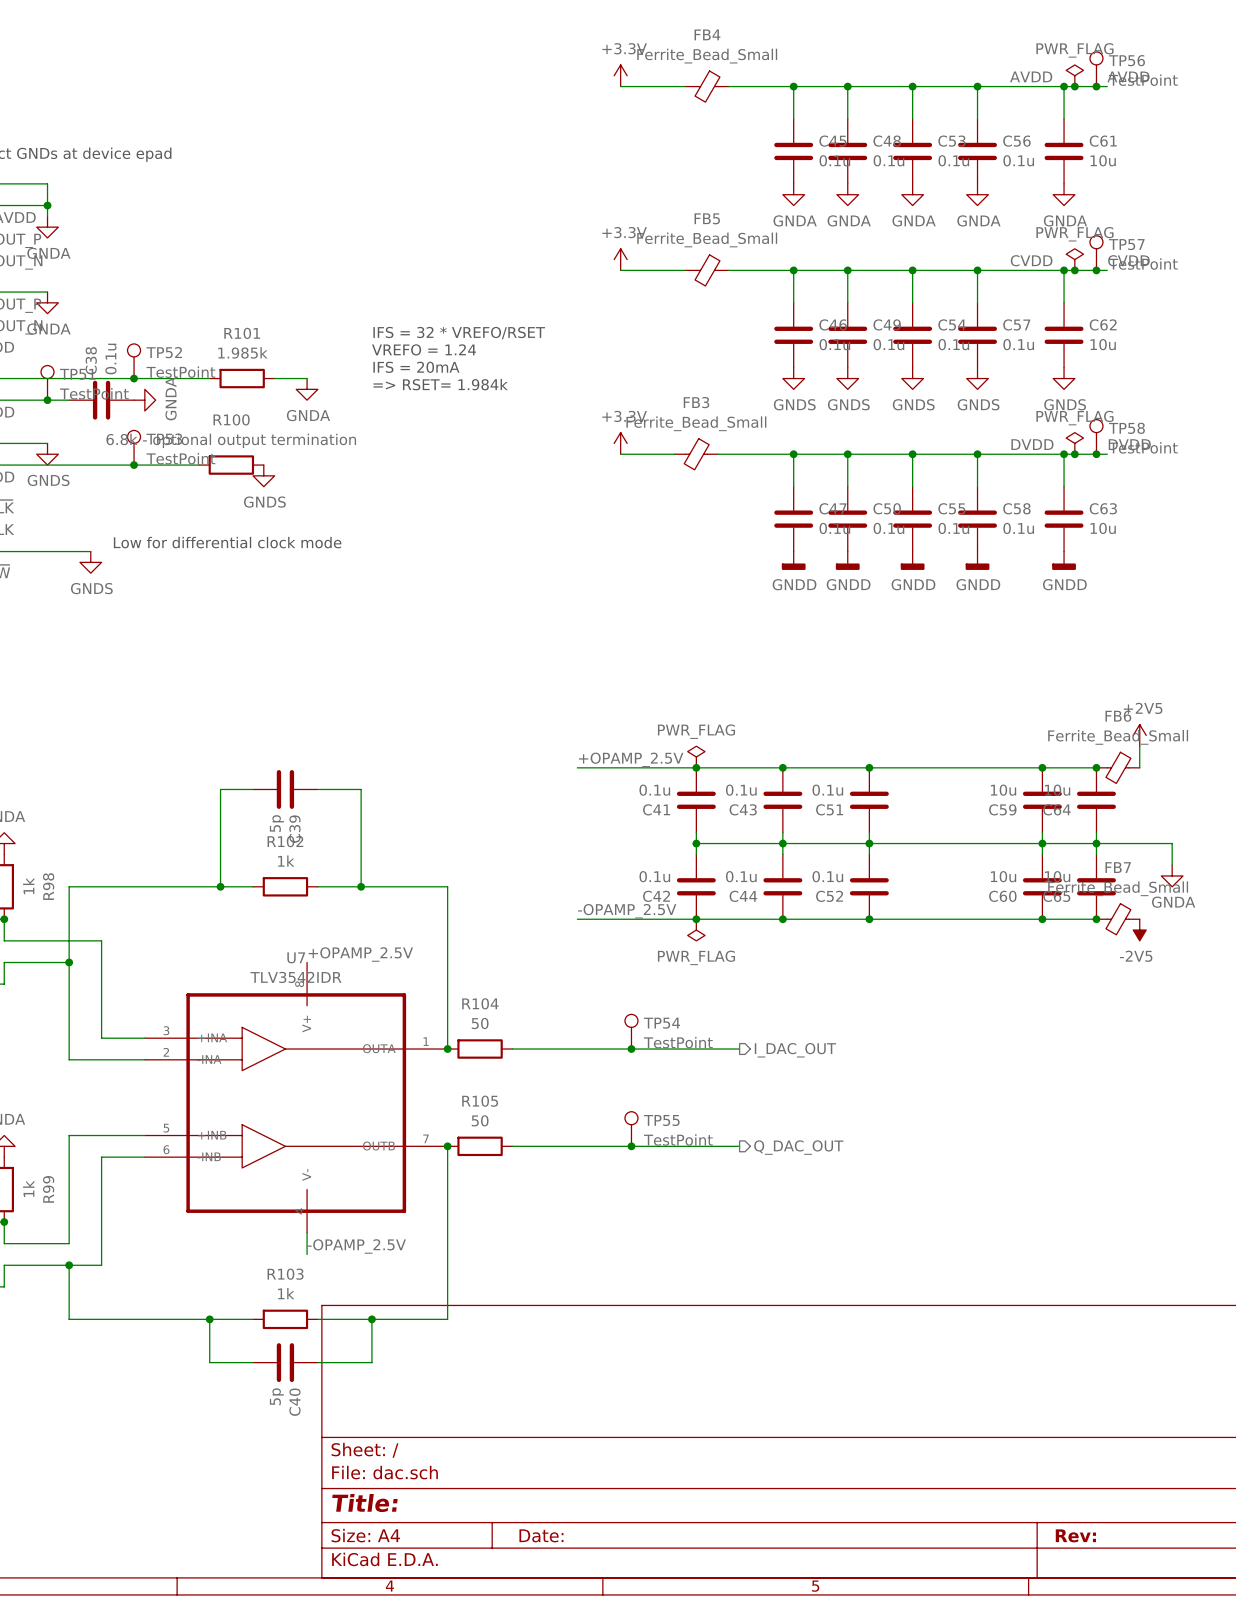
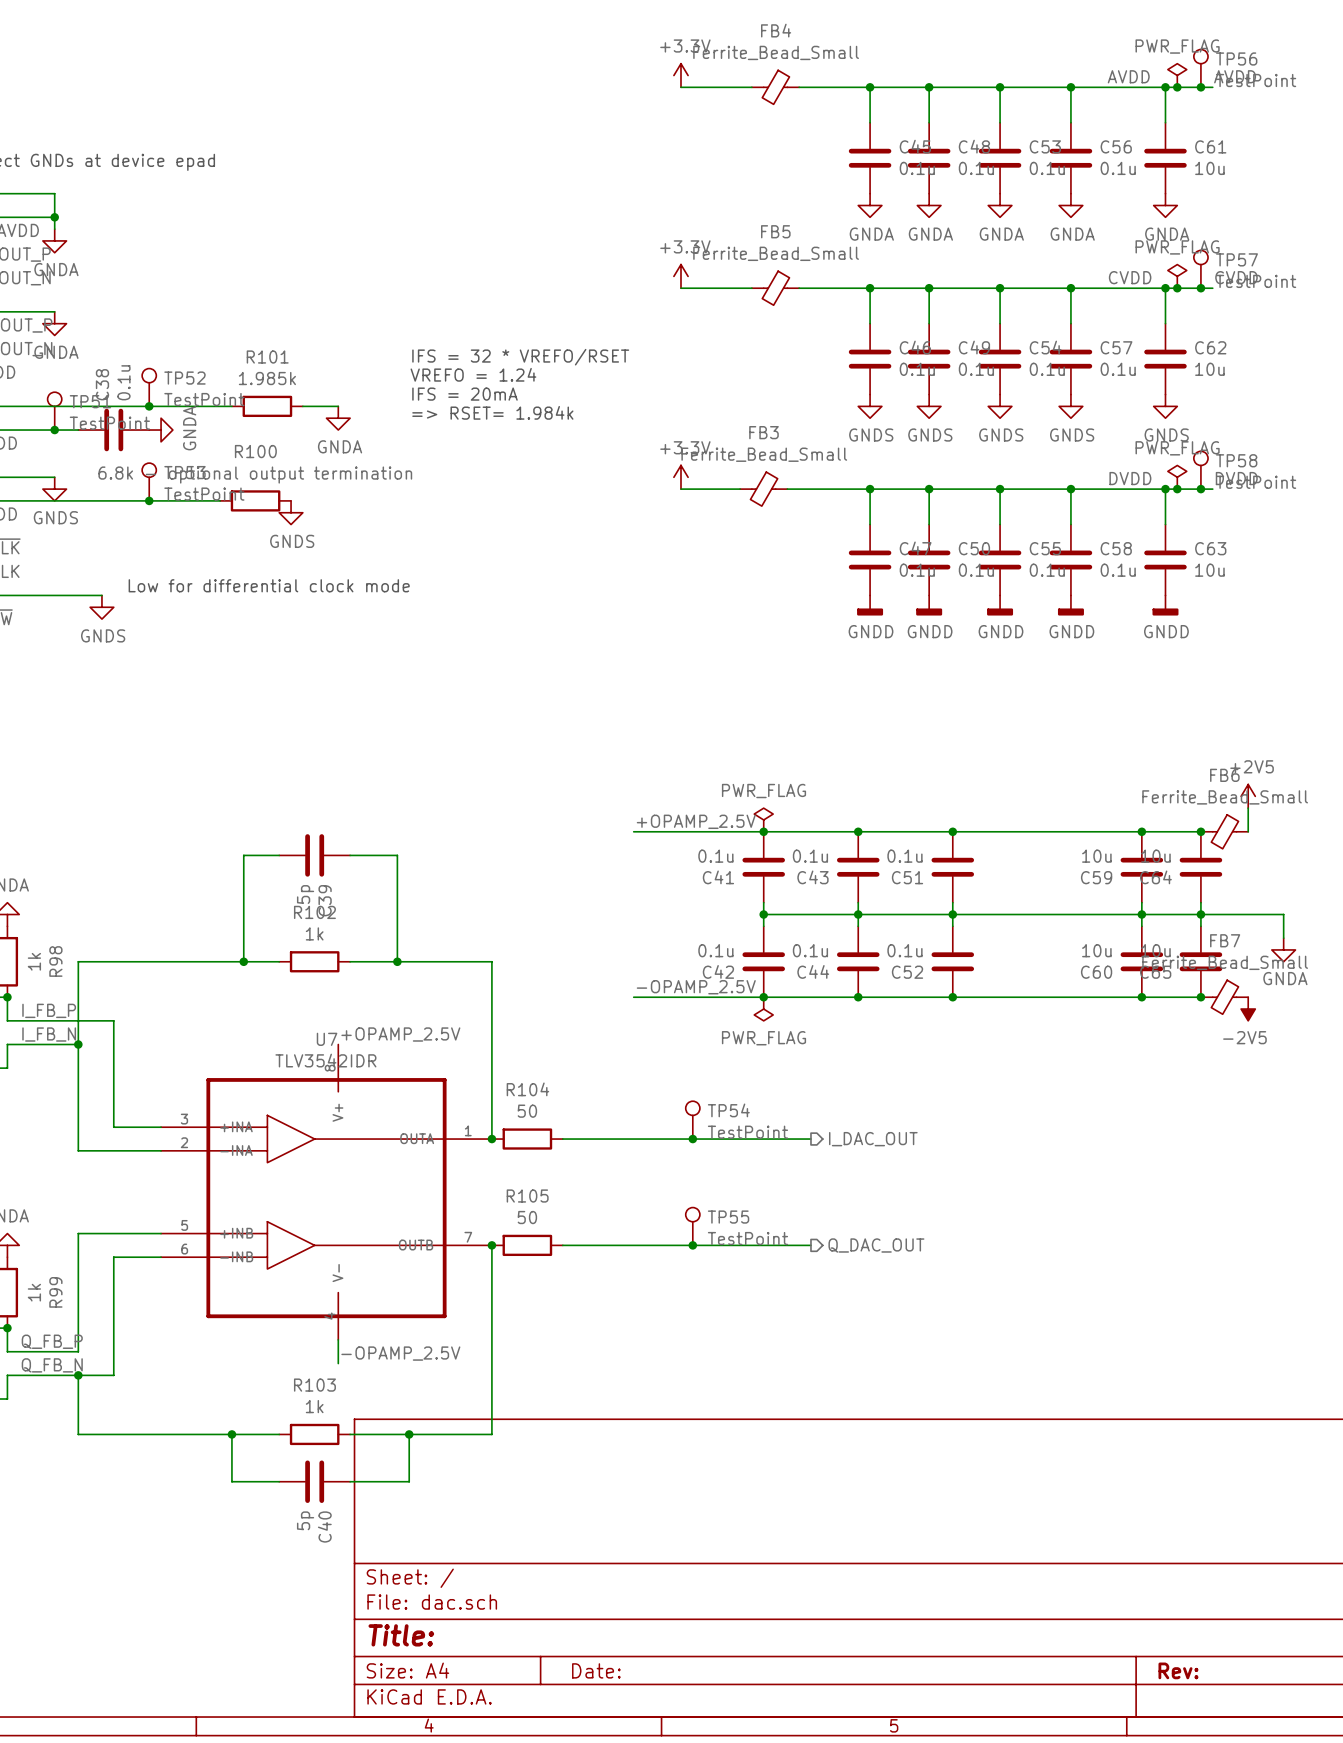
label: none -> I_FB_P (49, 1010)
label: none -> I_FB_N (49, 1034)
label: none -> Q_FB_P (52, 1341)
label: none -> Q_FB_N (52, 1365)

